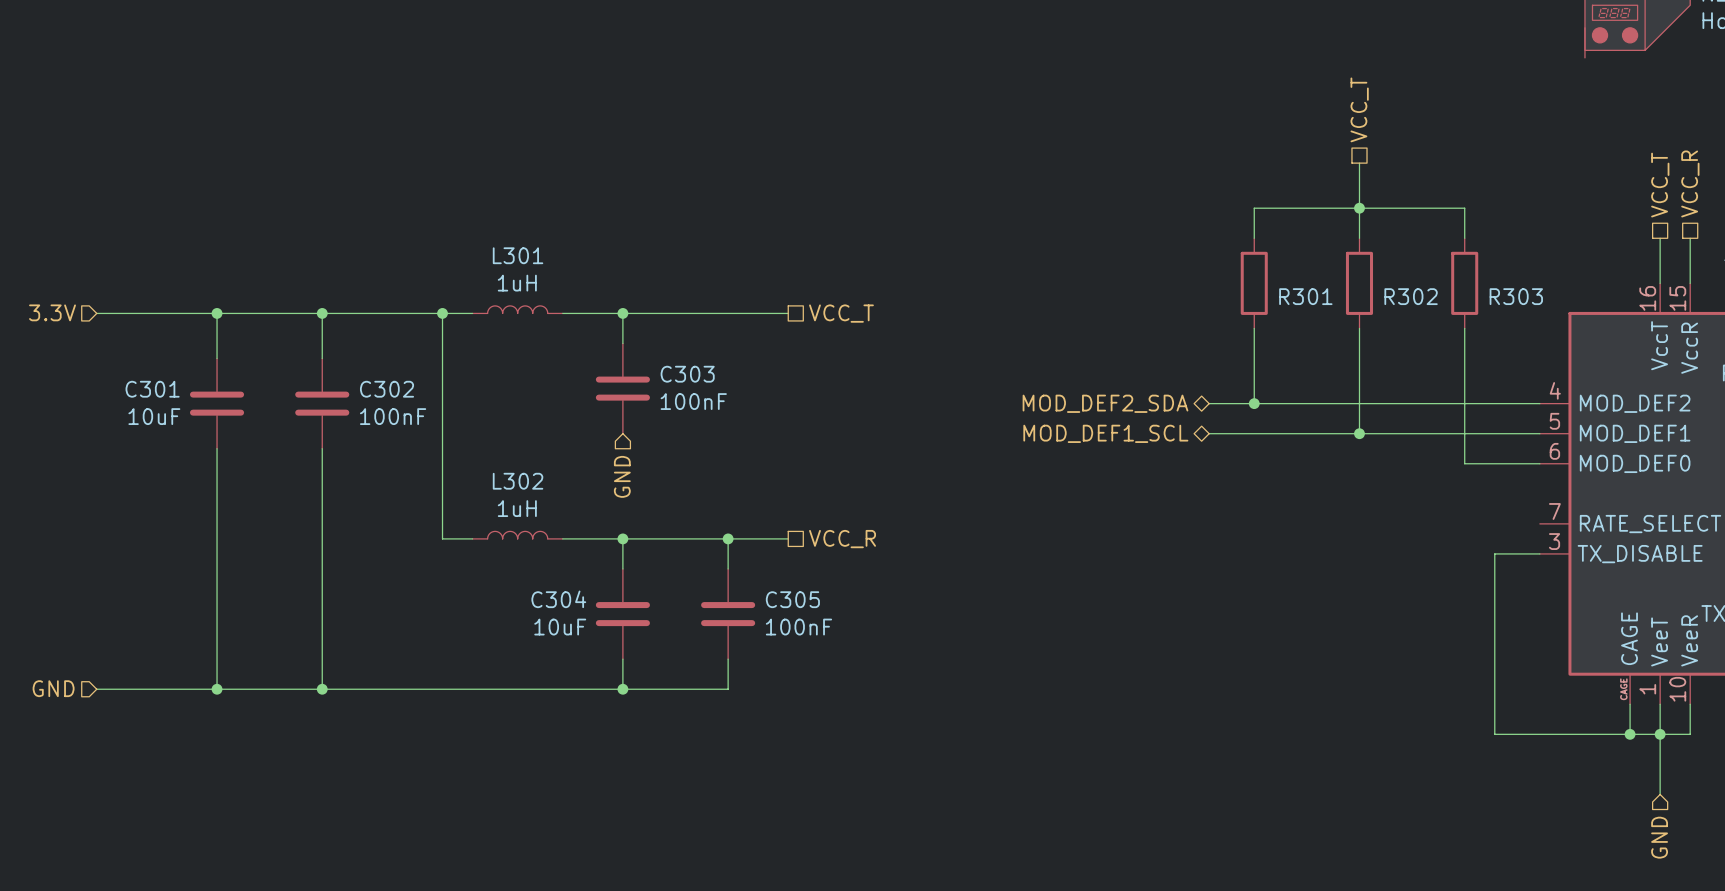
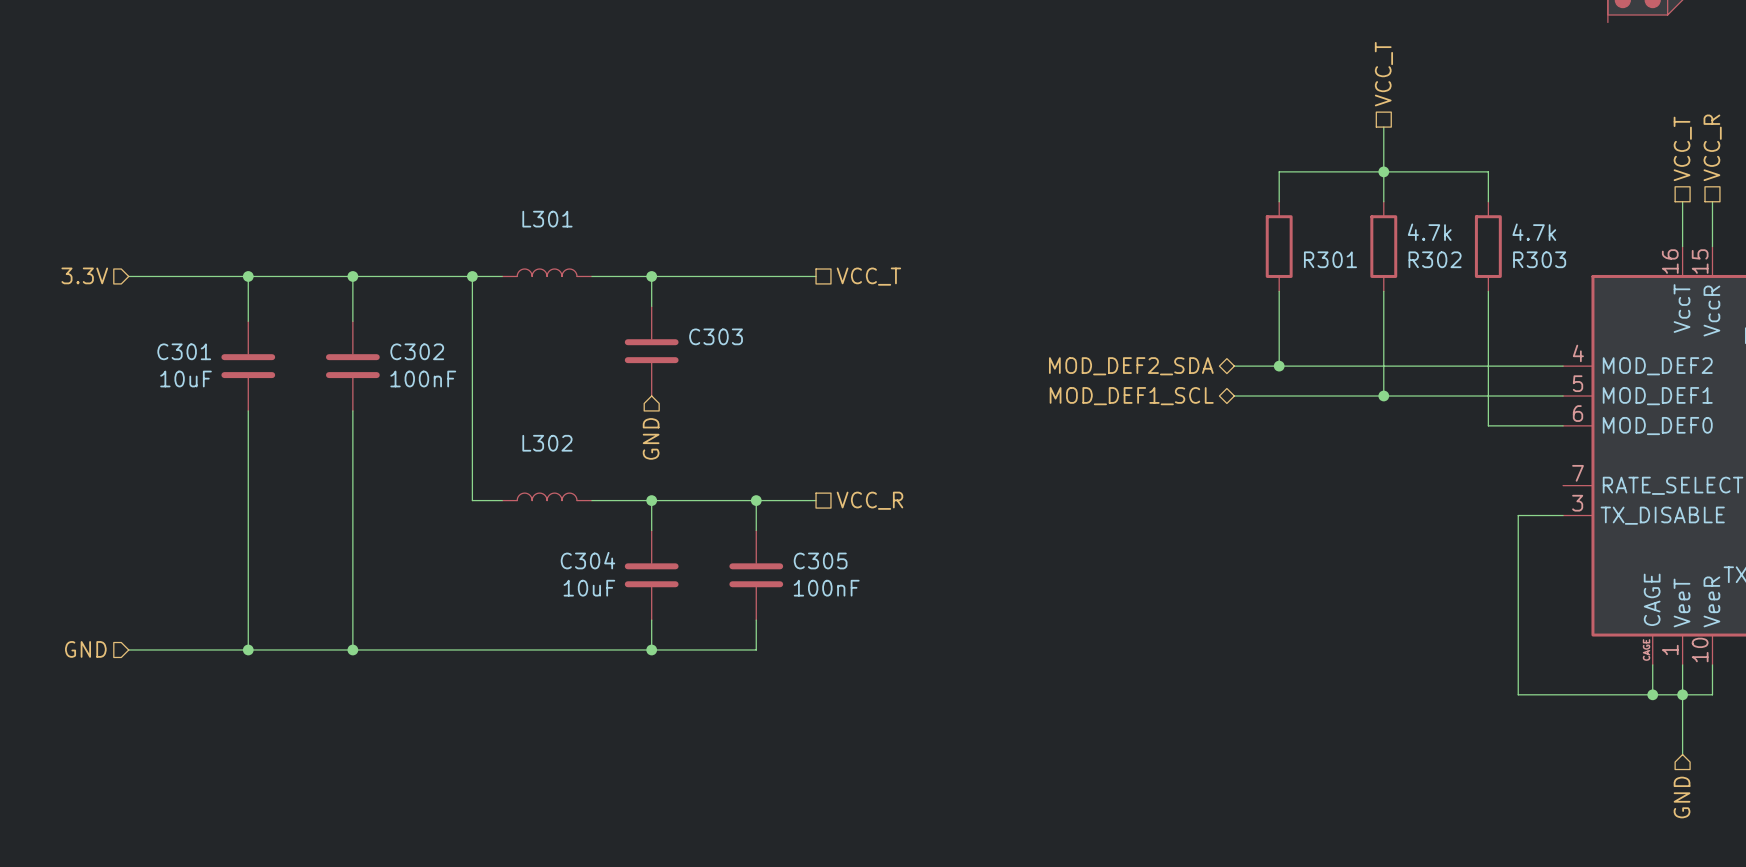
R302 value: none -> 4.7k (1429, 232)
R303 value: none -> 4.7k (1534, 232)
L301 value: 1uH (517, 283) -> none
C303 value: 100nF (693, 401) -> none
L302 value: 1uH (517, 508) -> none

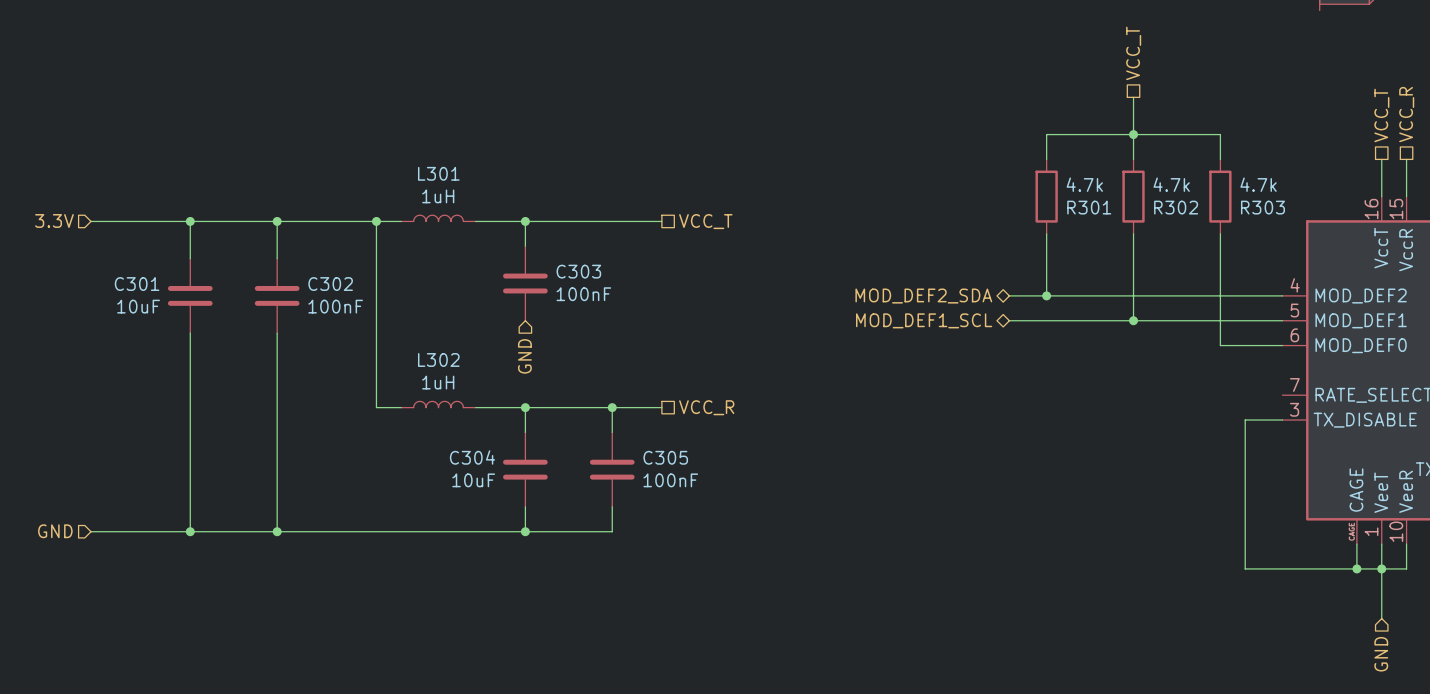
R301 value: none -> 4.7k (1084, 184)
L301 value: none -> 1uH (438, 196)
C303 value: none -> 100nF (583, 294)
L302 value: none -> 1uH (438, 382)

